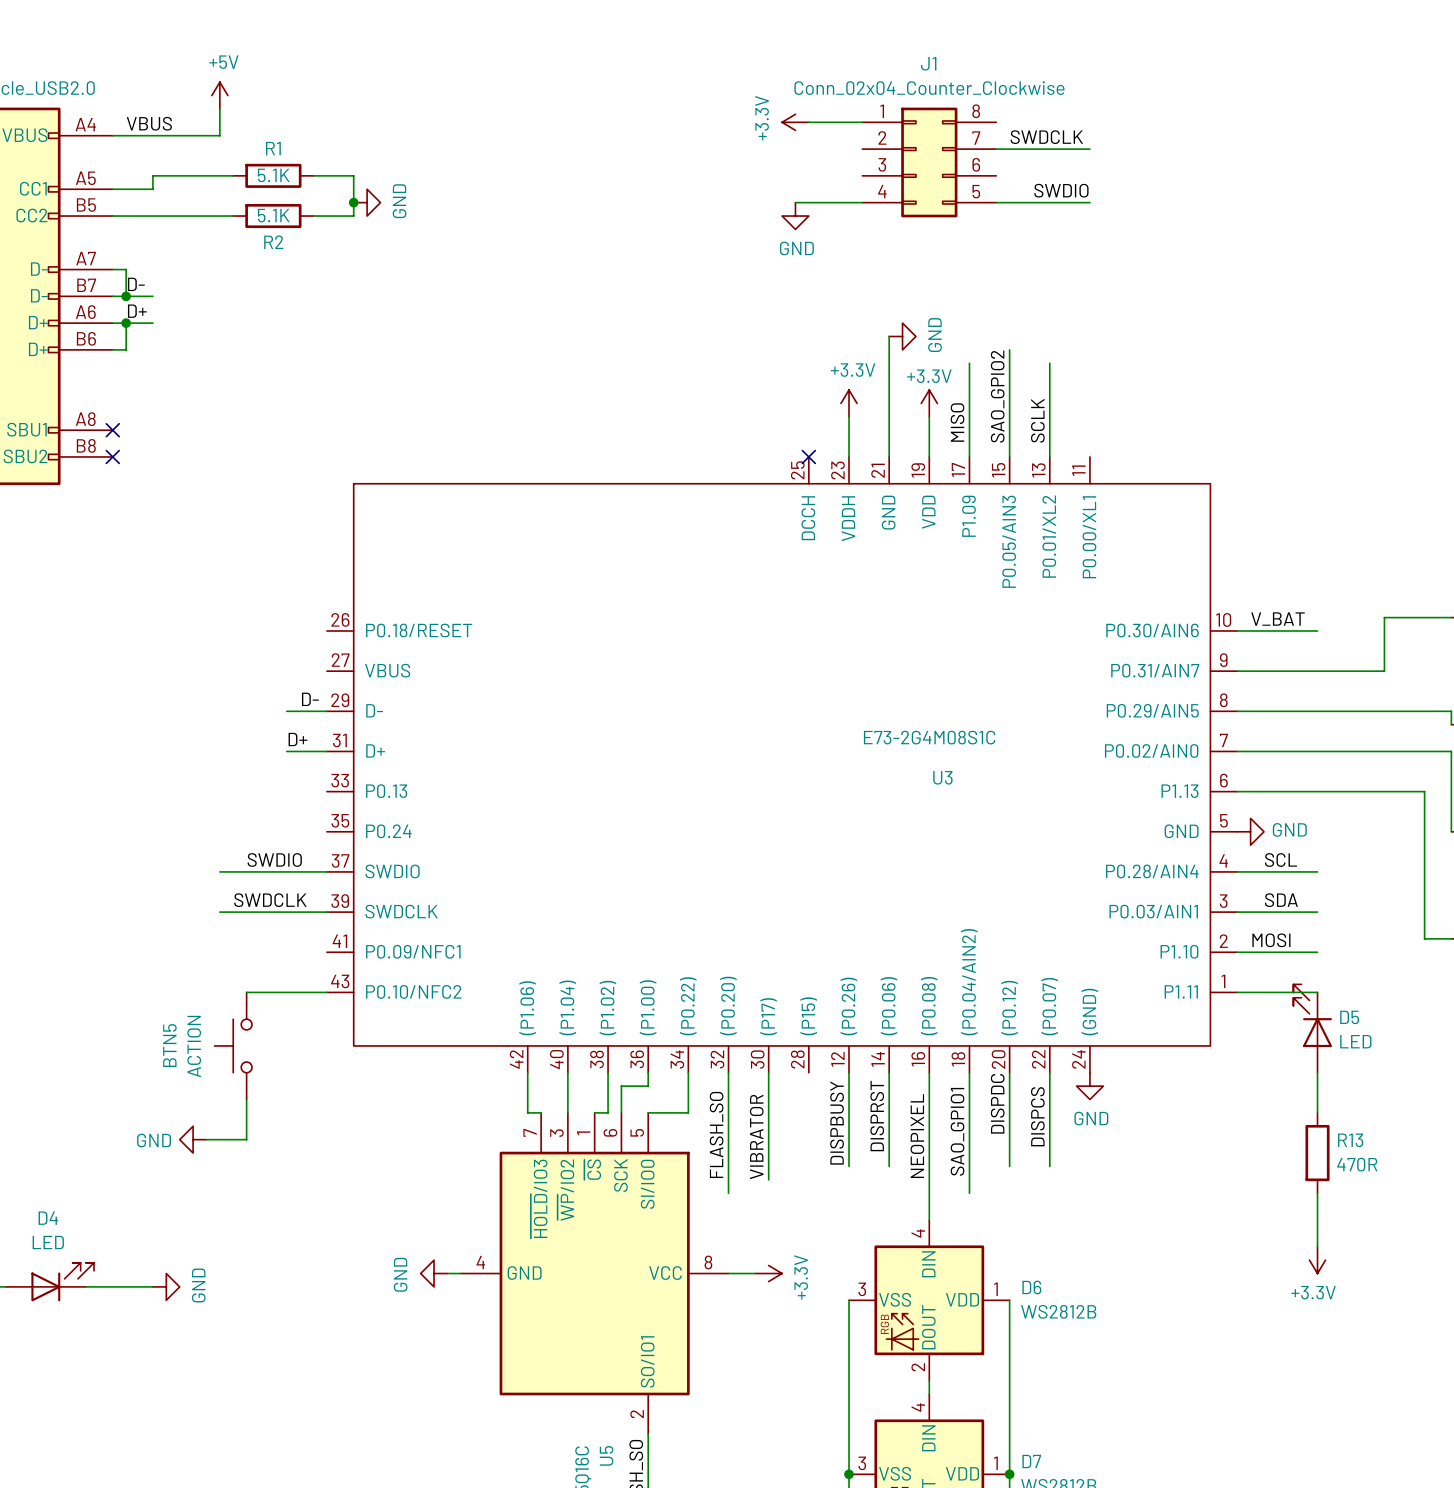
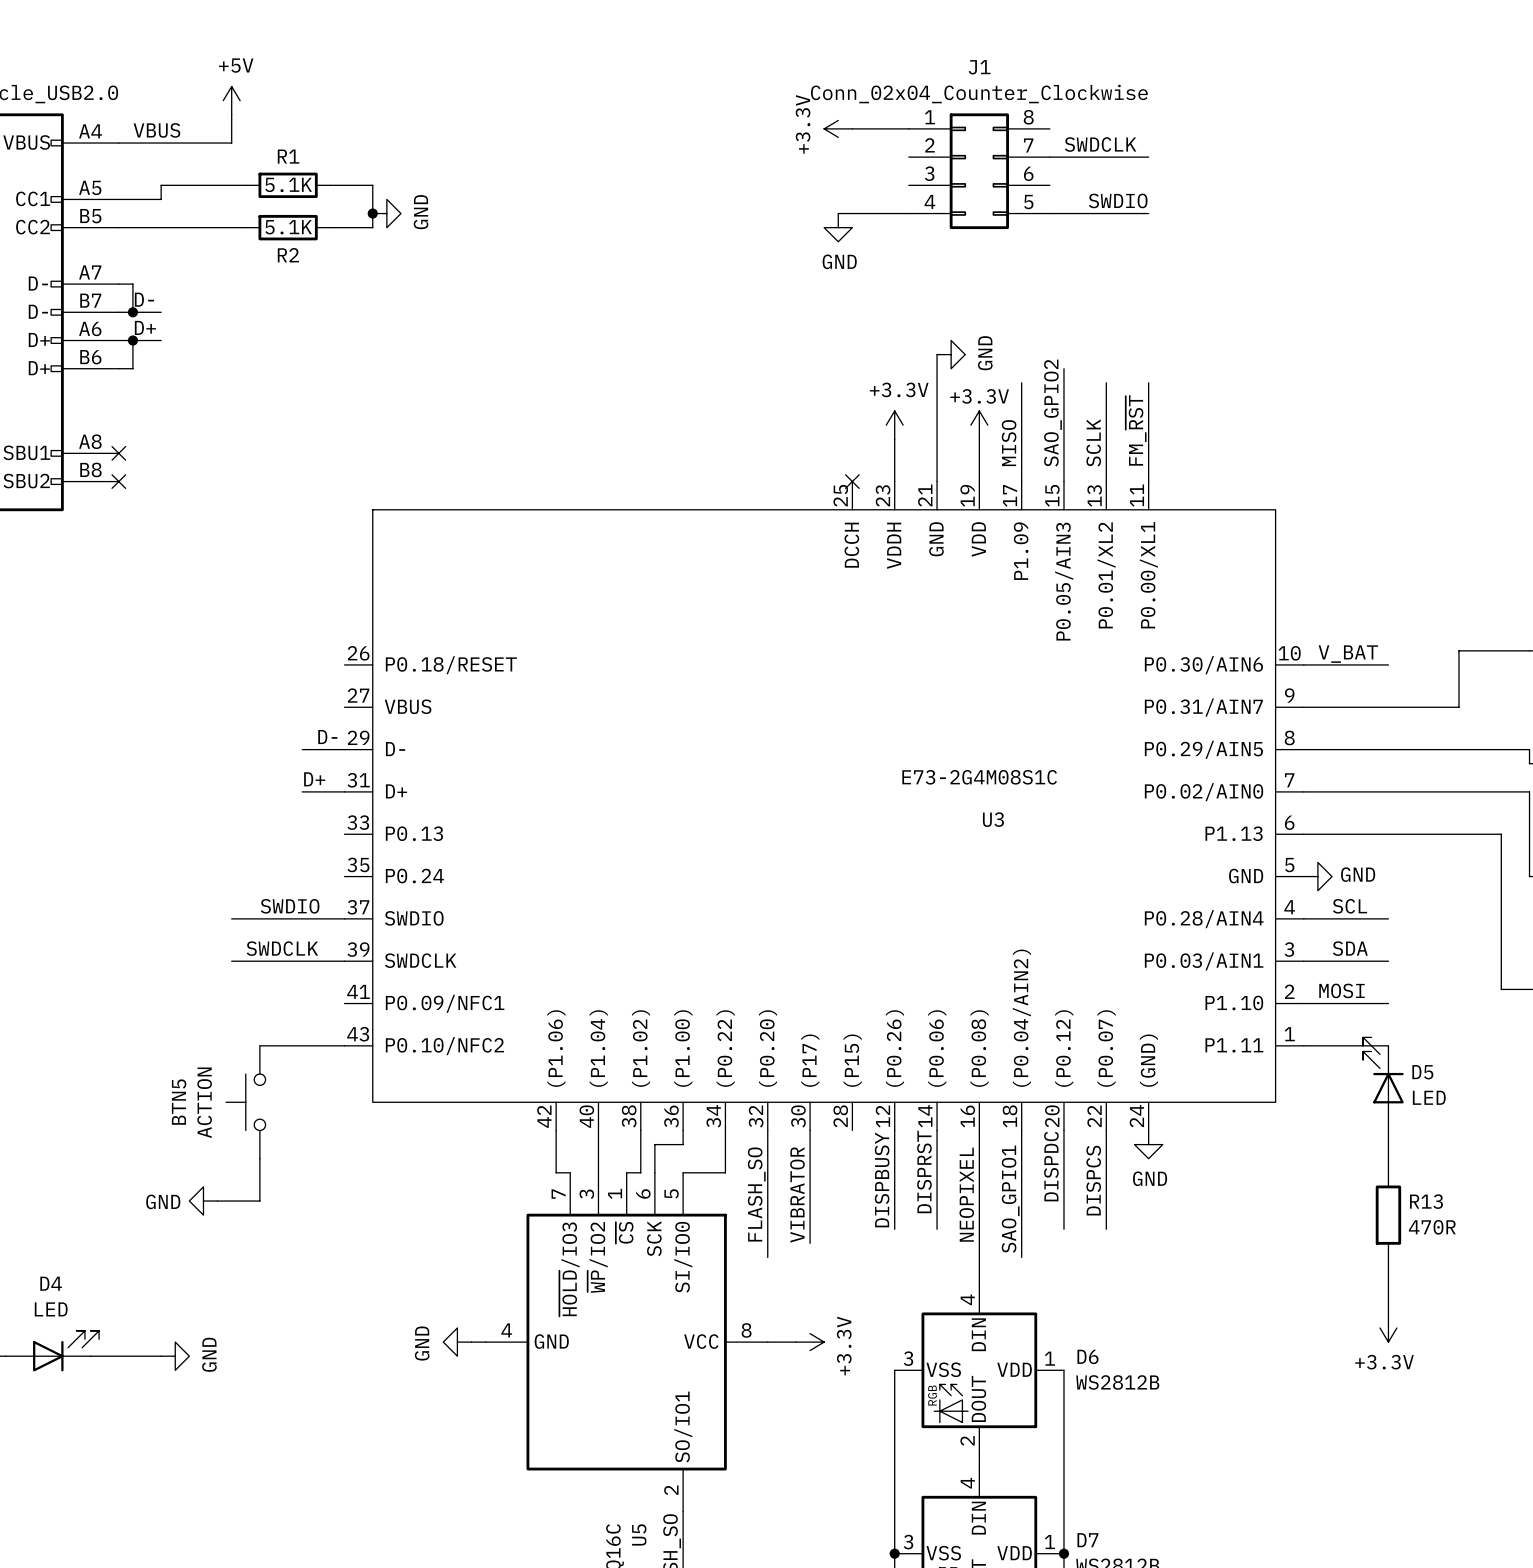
wire: none -> (1148, 382) (1148, 481)
label: none -> FM_~{RST} (1136, 430)

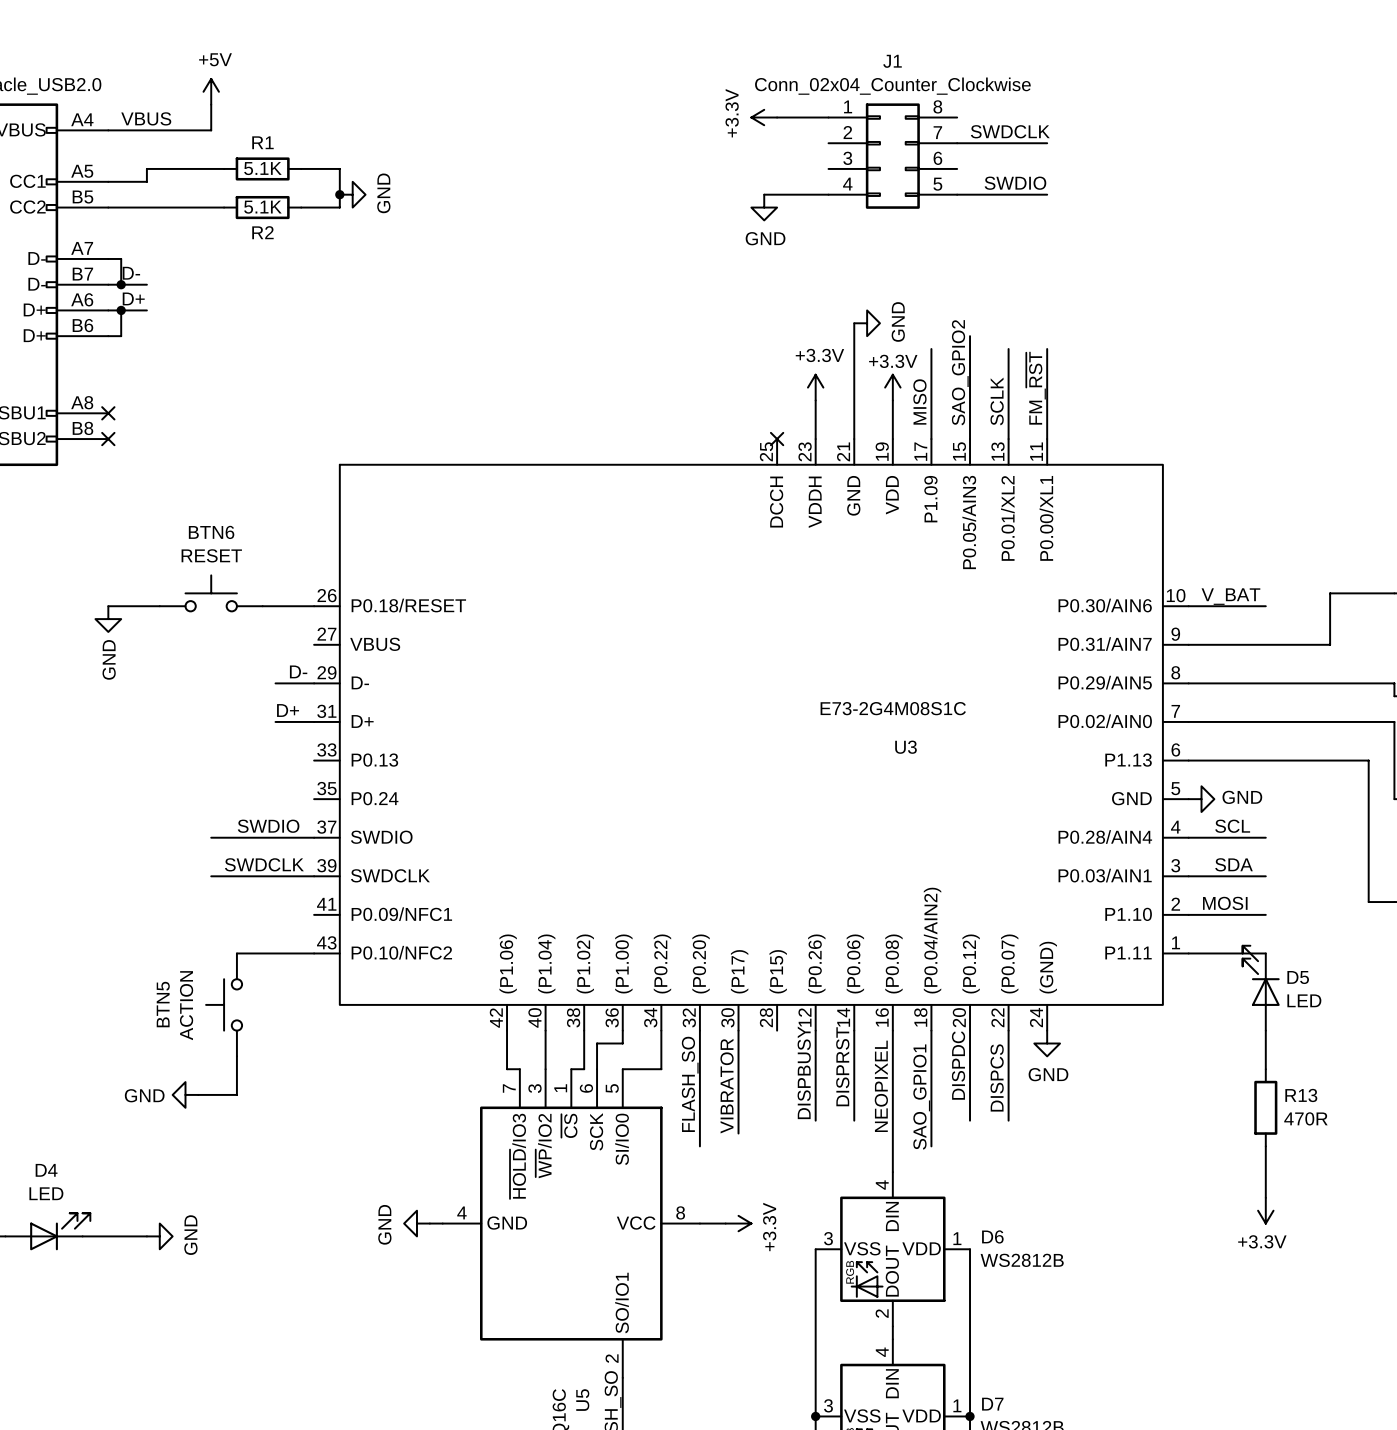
BTN6: none -> RESET (211, 593)
wire: none -> (108, 606) (159, 606)
wire: none -> (262, 606) (314, 606)
power symbol: none -> GND (108, 619)

